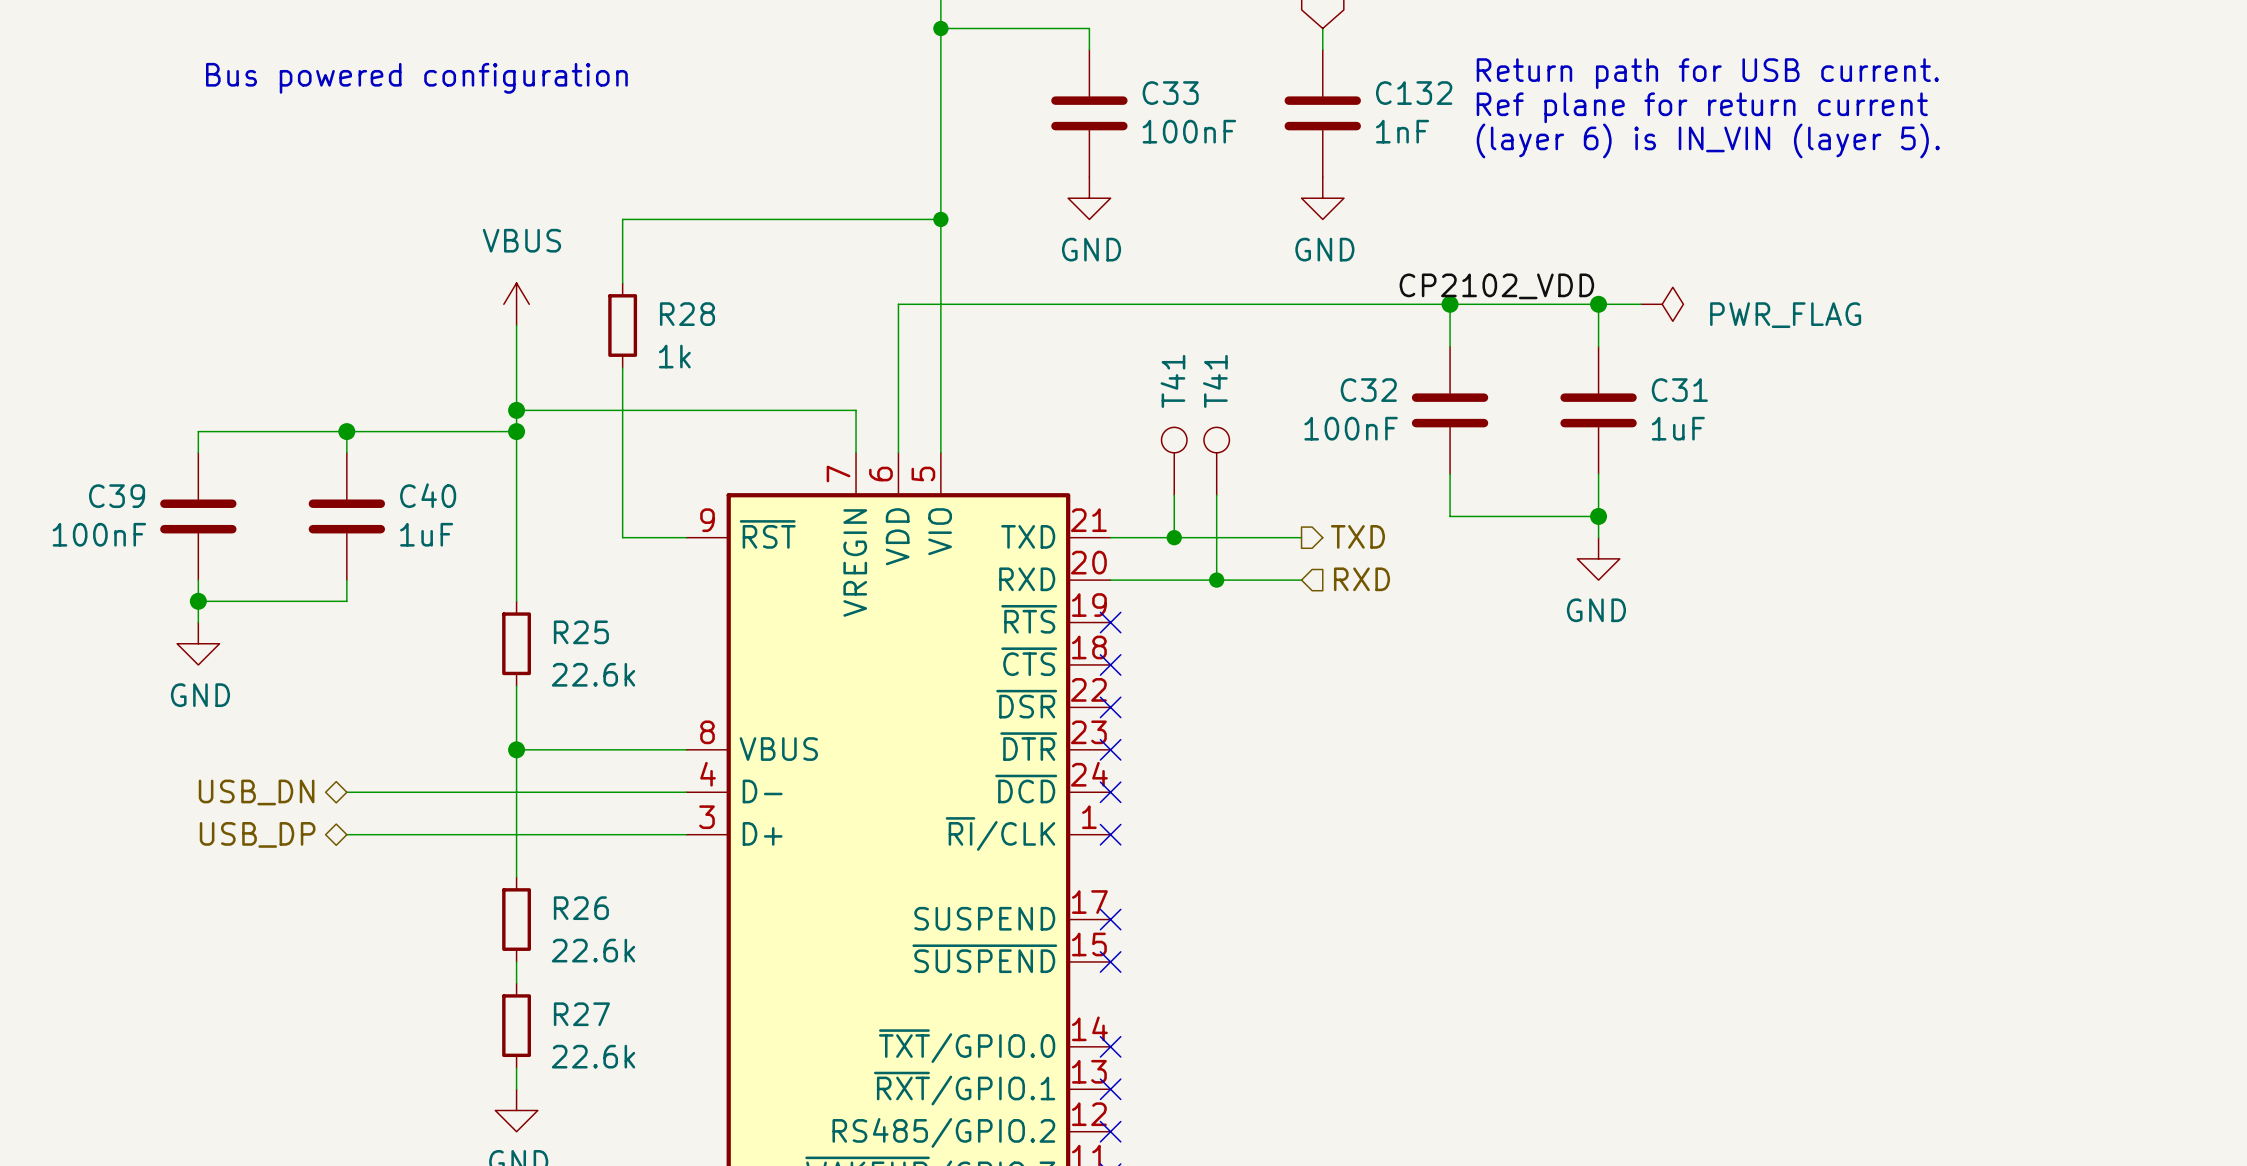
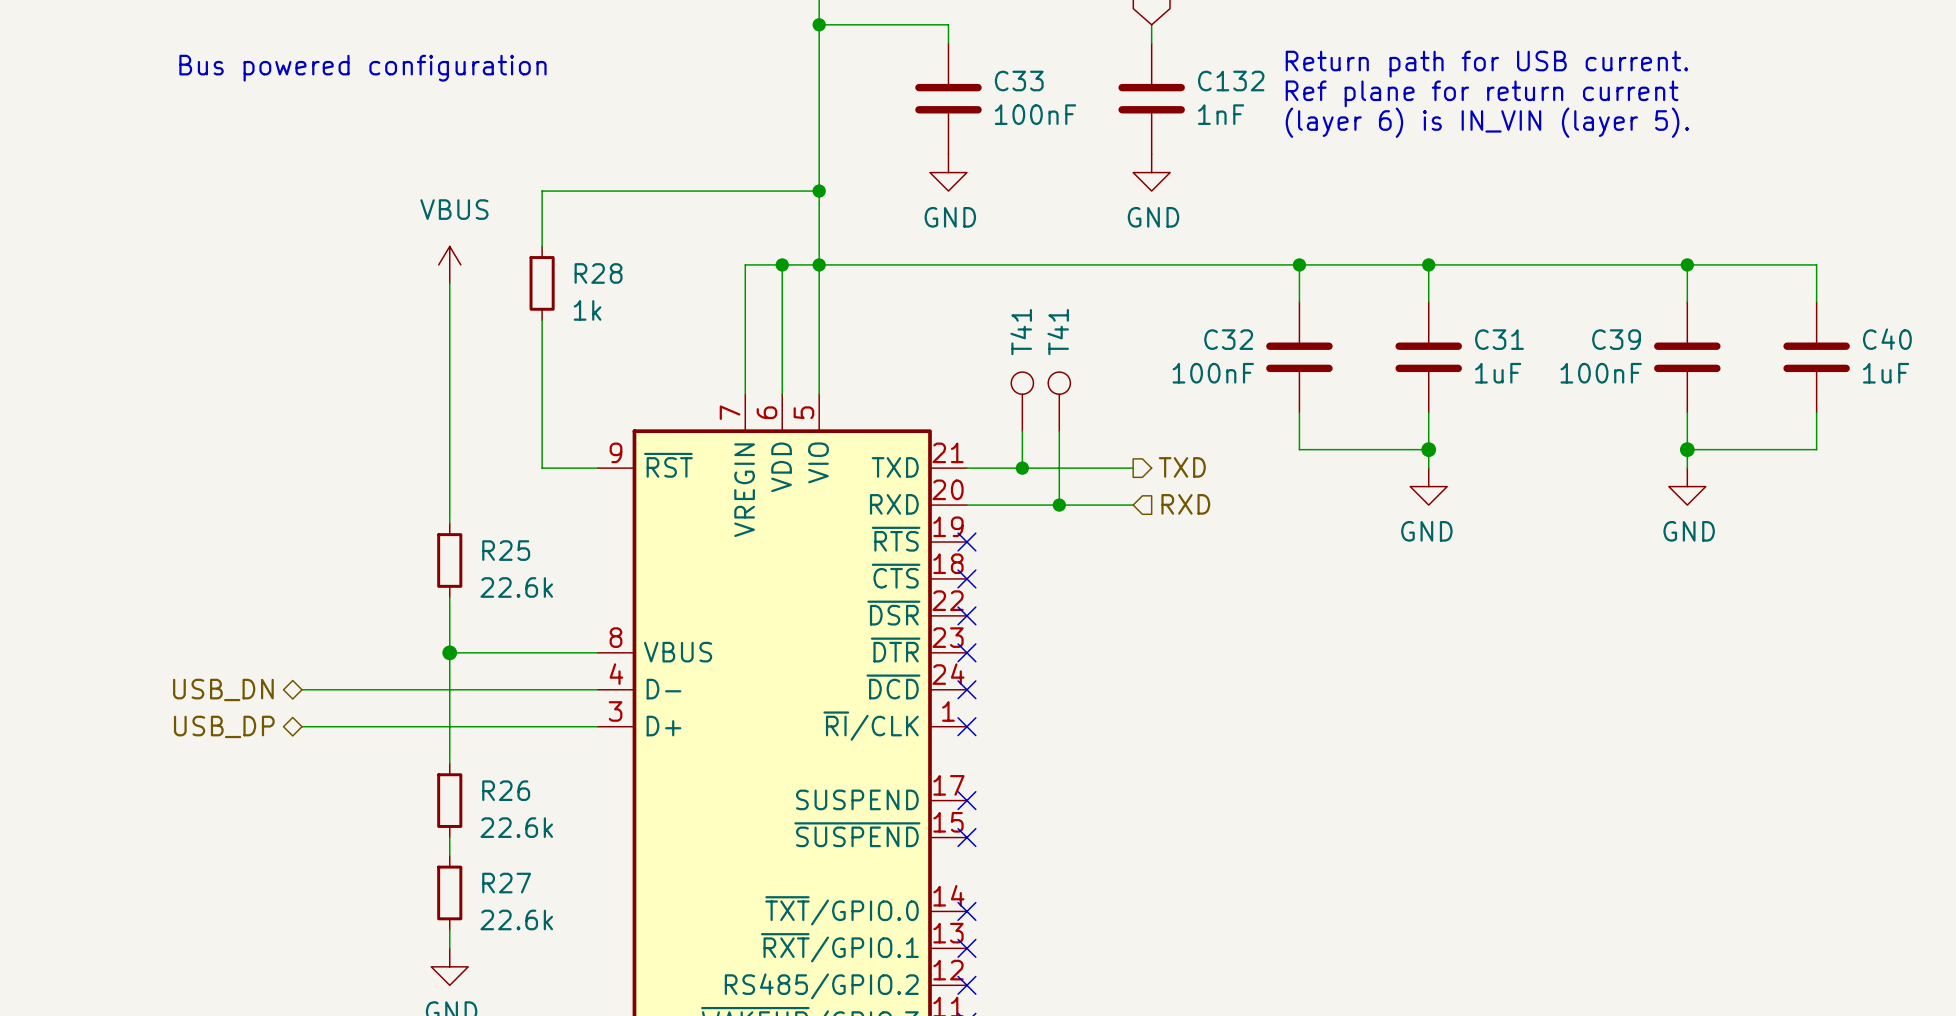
label: CP2102_VDD (1496, 286) -> none
junction: none -> (782, 264)
junction: none -> (819, 264)
wire: (1450, 304) (1450, 346) -> (1299, 264) (1299, 301)
junction: (1450, 304) -> none
junction: none -> (1299, 264)
wire: (1598, 304) (1598, 346) -> (1687, 264) (1687, 301)
junction: (1598, 304) -> none
junction: none -> (1428, 264)
power symbol: PWR_FLAG (1662, 304) -> none
junction: none -> (1687, 264)
wire: none -> (1428, 301) (1428, 264) (1816, 264) (1816, 301)
wire: (516, 410) (856, 410) -> (782, 264) (745, 264) (745, 357)
junction: (516, 410) -> none
C32 position: (1450, 410) -> (1299, 357)
C31 position: (1598, 410) -> (1428, 357)
wire: (346, 431) (346, 452) -> none
junction: (346, 431) -> none
wire: (516, 431) (198, 431) (198, 452) -> none
junction: (516, 431) -> none
wire: (1450, 474) (1450, 516) (1492, 516) -> (1299, 412) (1299, 449)
wire: (1598, 474) (1598, 537) -> (1428, 412) (1428, 468)
wire: none -> (1687, 412) (1687, 468)
wire: none -> (1816, 412) (1816, 449) (1687, 449)
C39 position: (198, 516) -> (1687, 357)
C40 position: (346, 516) -> (1816, 357)
wire: none -> (1391, 449) (1428, 449)
junction position: (1598, 516) -> (1428, 449)
junction: none -> (1687, 449)
power symbol position: GND (1598, 558) -> GND (1428, 486)
power symbol: none -> GND (1687, 486)
wire: (198, 580) (198, 622) -> none
wire: (346, 580) (346, 601) (198, 601) -> none
junction: (198, 601) -> none
power symbol: GND (198, 643) -> none

